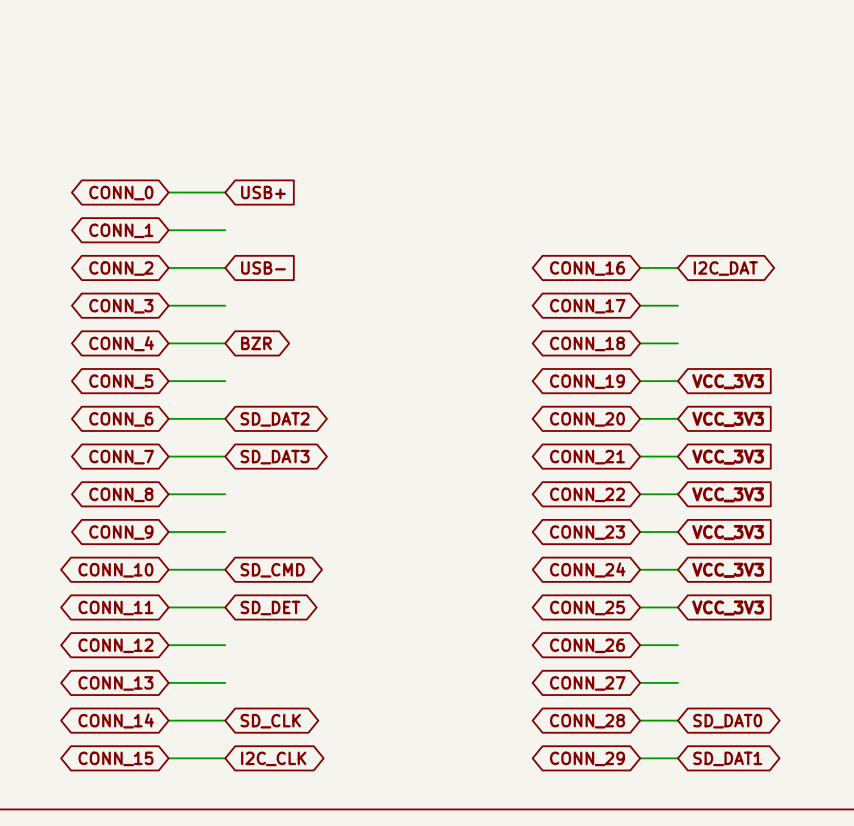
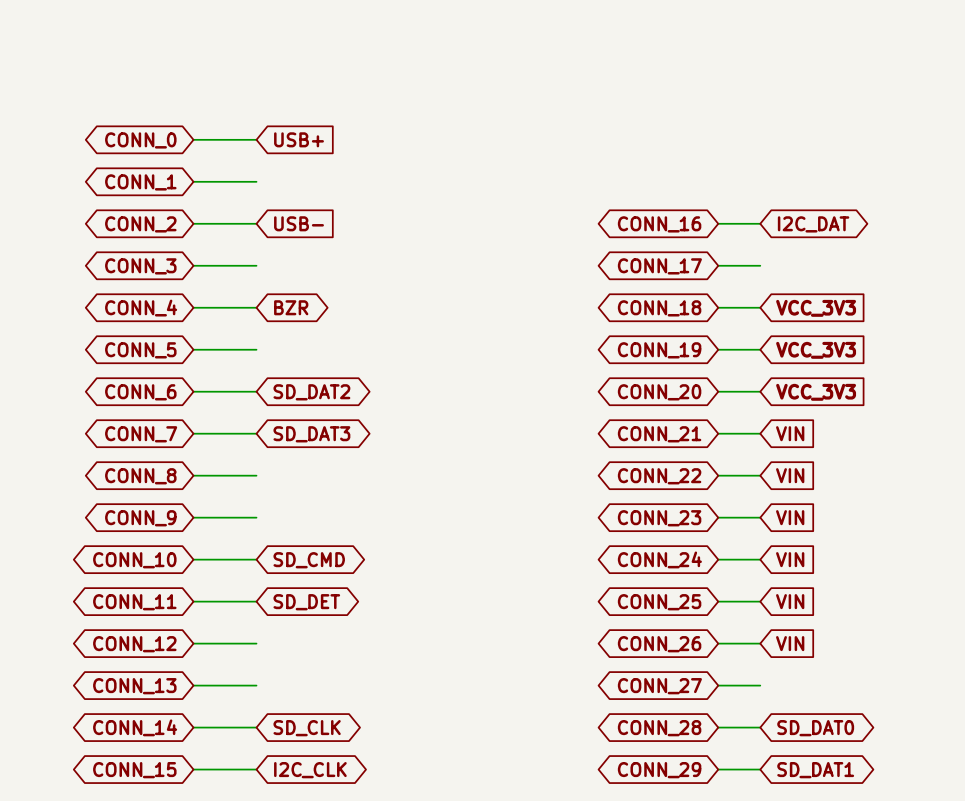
global label: none -> VCC_3V3 (816, 308)
global label: VCC_3V3 (728, 457) -> VIN (790, 433)
global label: VCC_3V3 (728, 494) -> VIN (790, 475)
global label: VCC_3V3 (728, 532) -> VIN (790, 517)
global label: VCC_3V3 (728, 570) -> VIN (790, 559)
global label: VCC_3V3 (728, 608) -> VIN (790, 601)
global label: none -> VIN (790, 643)

